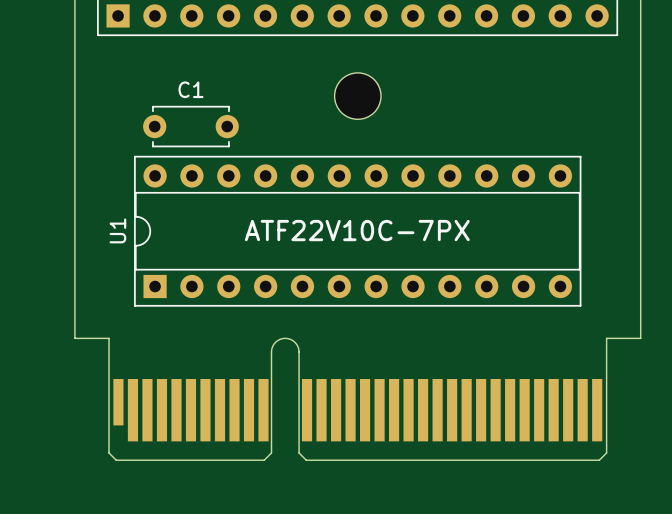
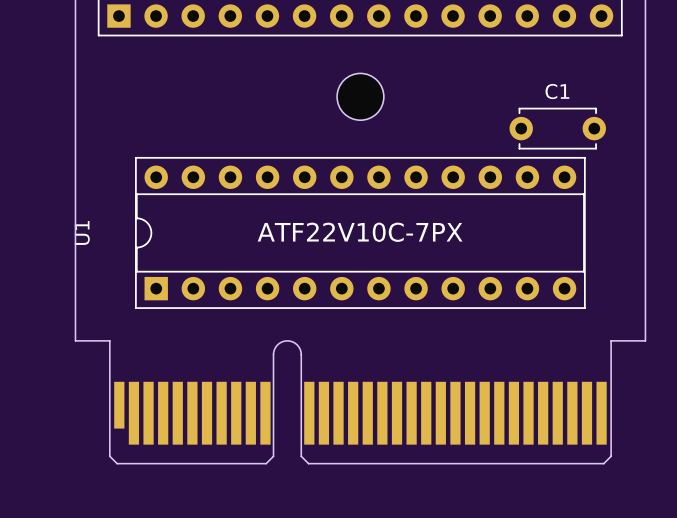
C1 position: (190, 126) -> (557, 128)
U1 name position: U1 (117, 230) -> U1 (82, 233)

